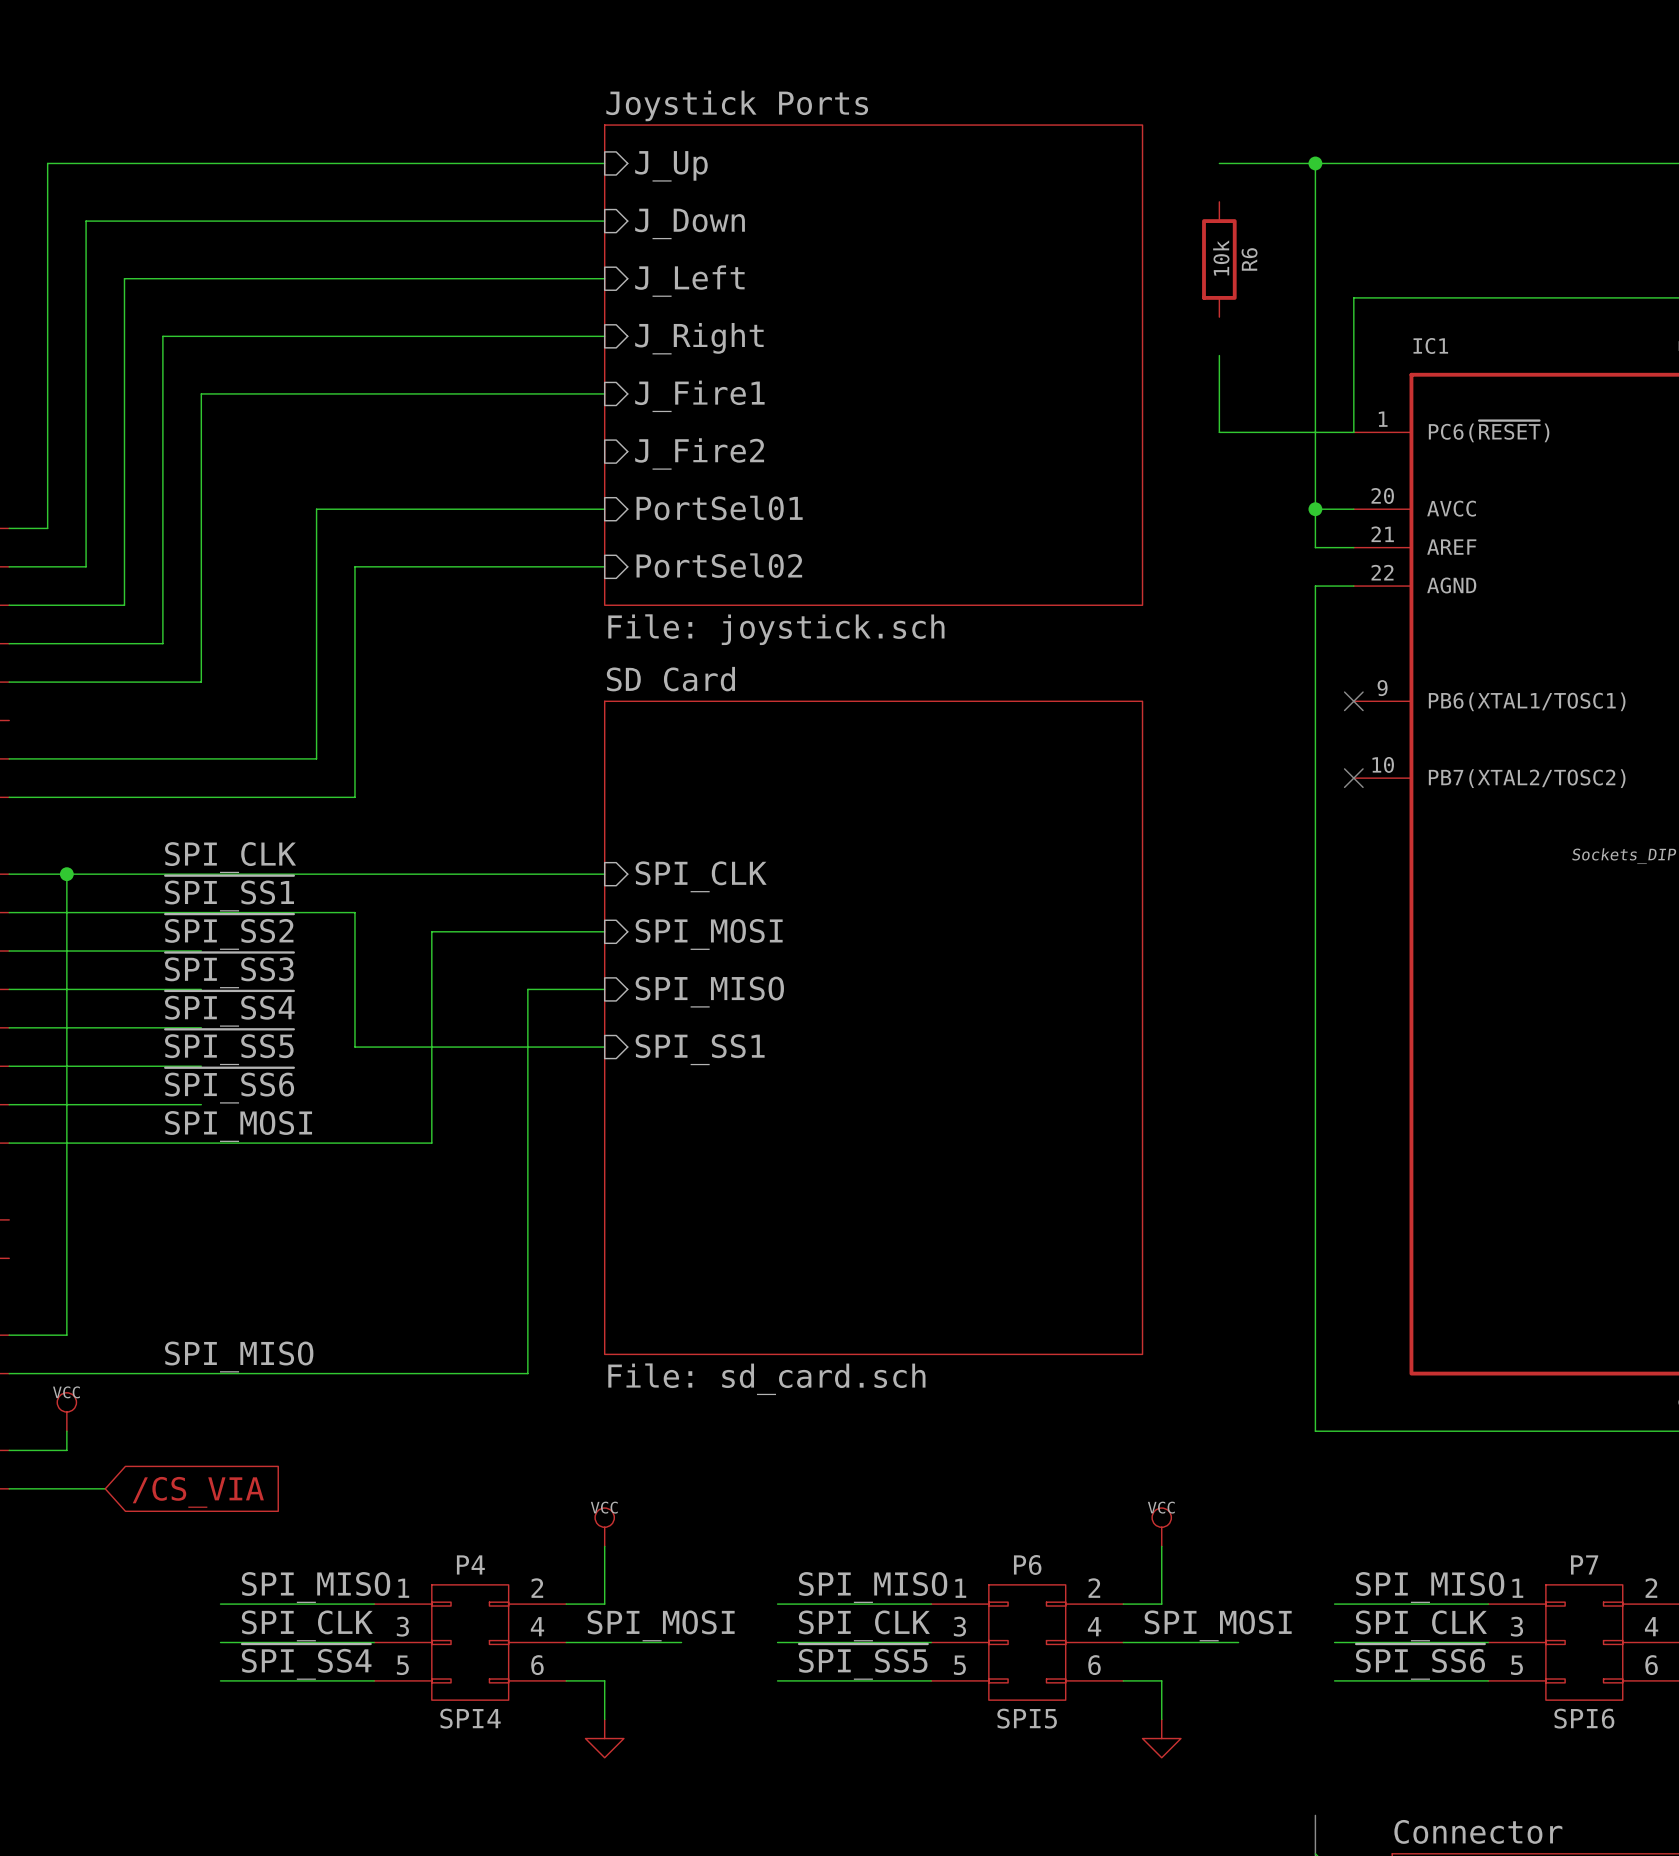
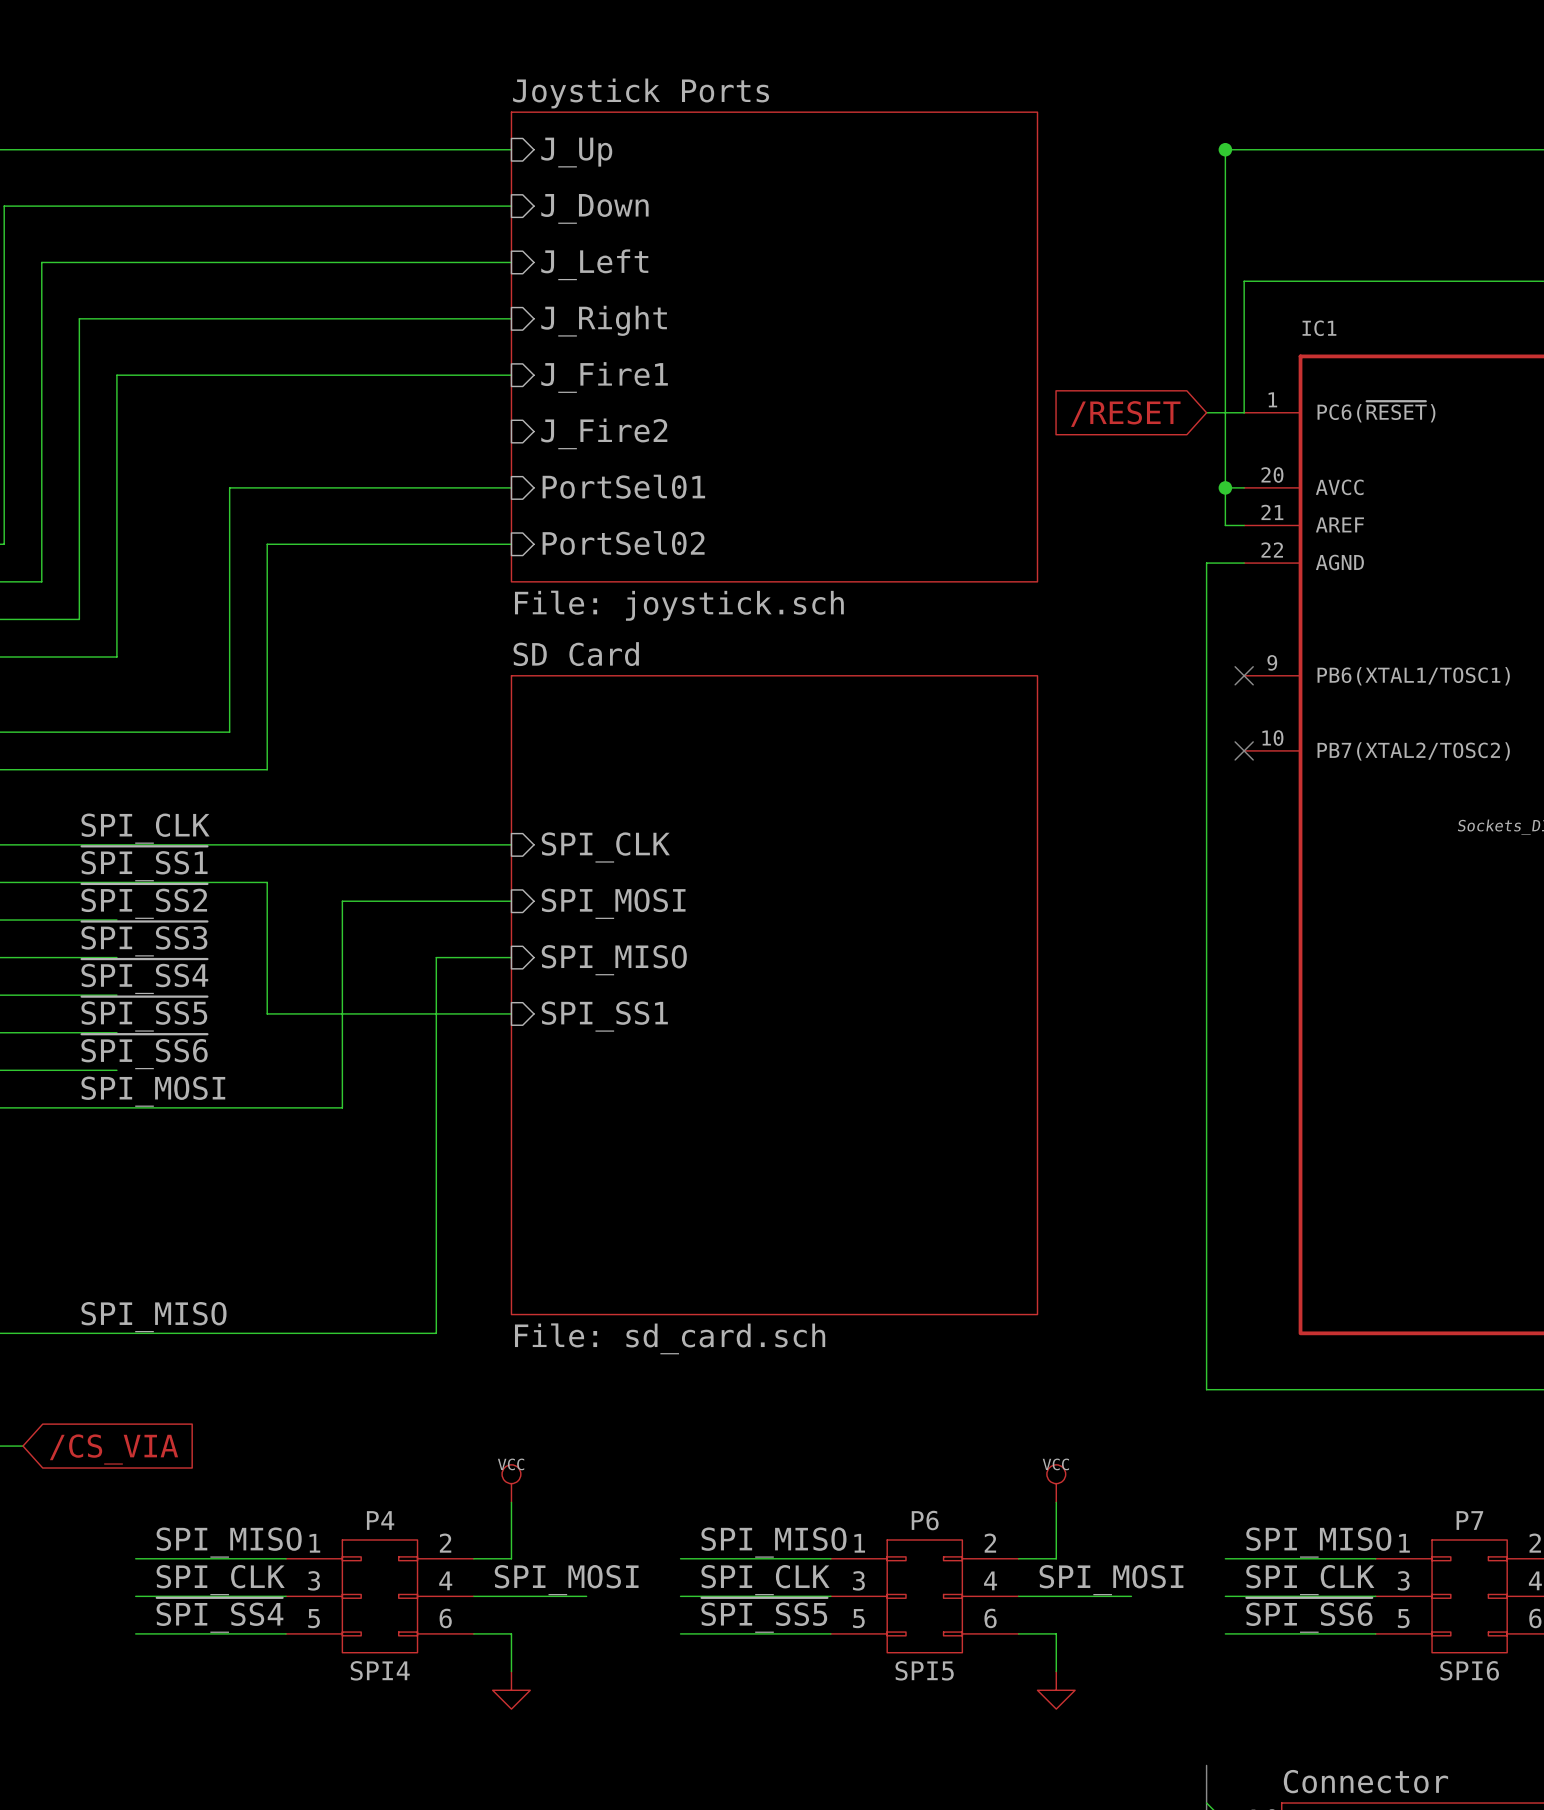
wire: (1219, 163) (1334, 163) -> none
wire: (1315, 163) (1315, 547) (1334, 547) -> (1225, 149) (1225, 525)
junction position: (1315, 163) -> (1225, 149)
R6: 10k (1219, 259) -> none
wire: (1219, 355) (1219, 432) (1315, 432) -> none
global label: none -> /RESET (1125, 413)
wire: (1315, 509) (1334, 509) -> none
junction position: (1315, 509) -> (1225, 487)

